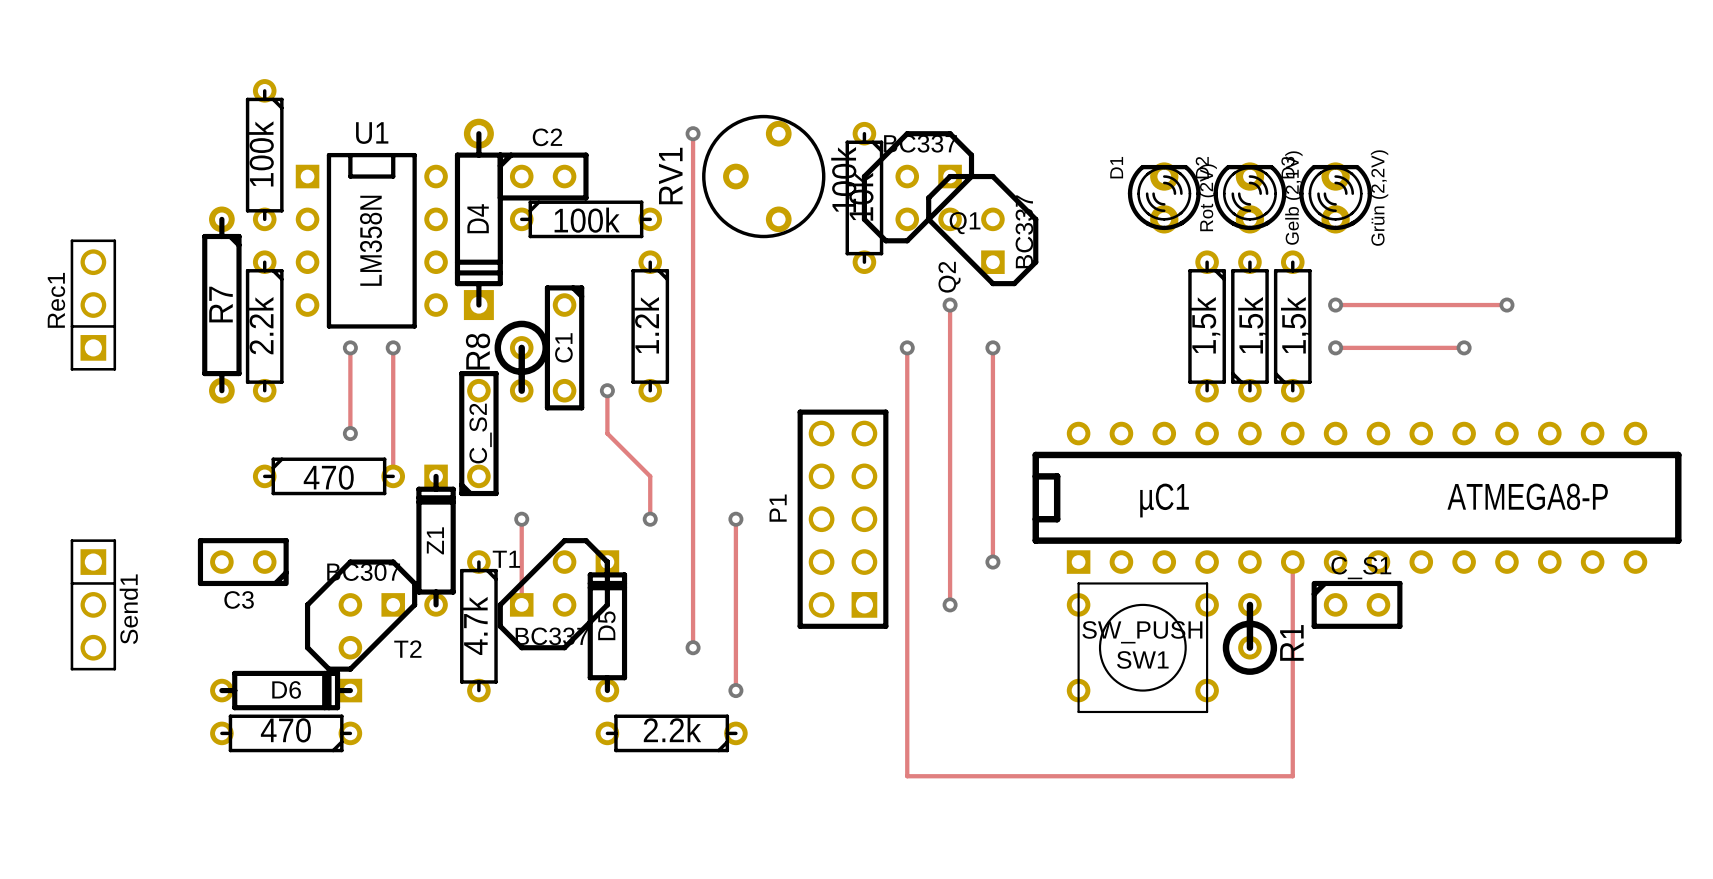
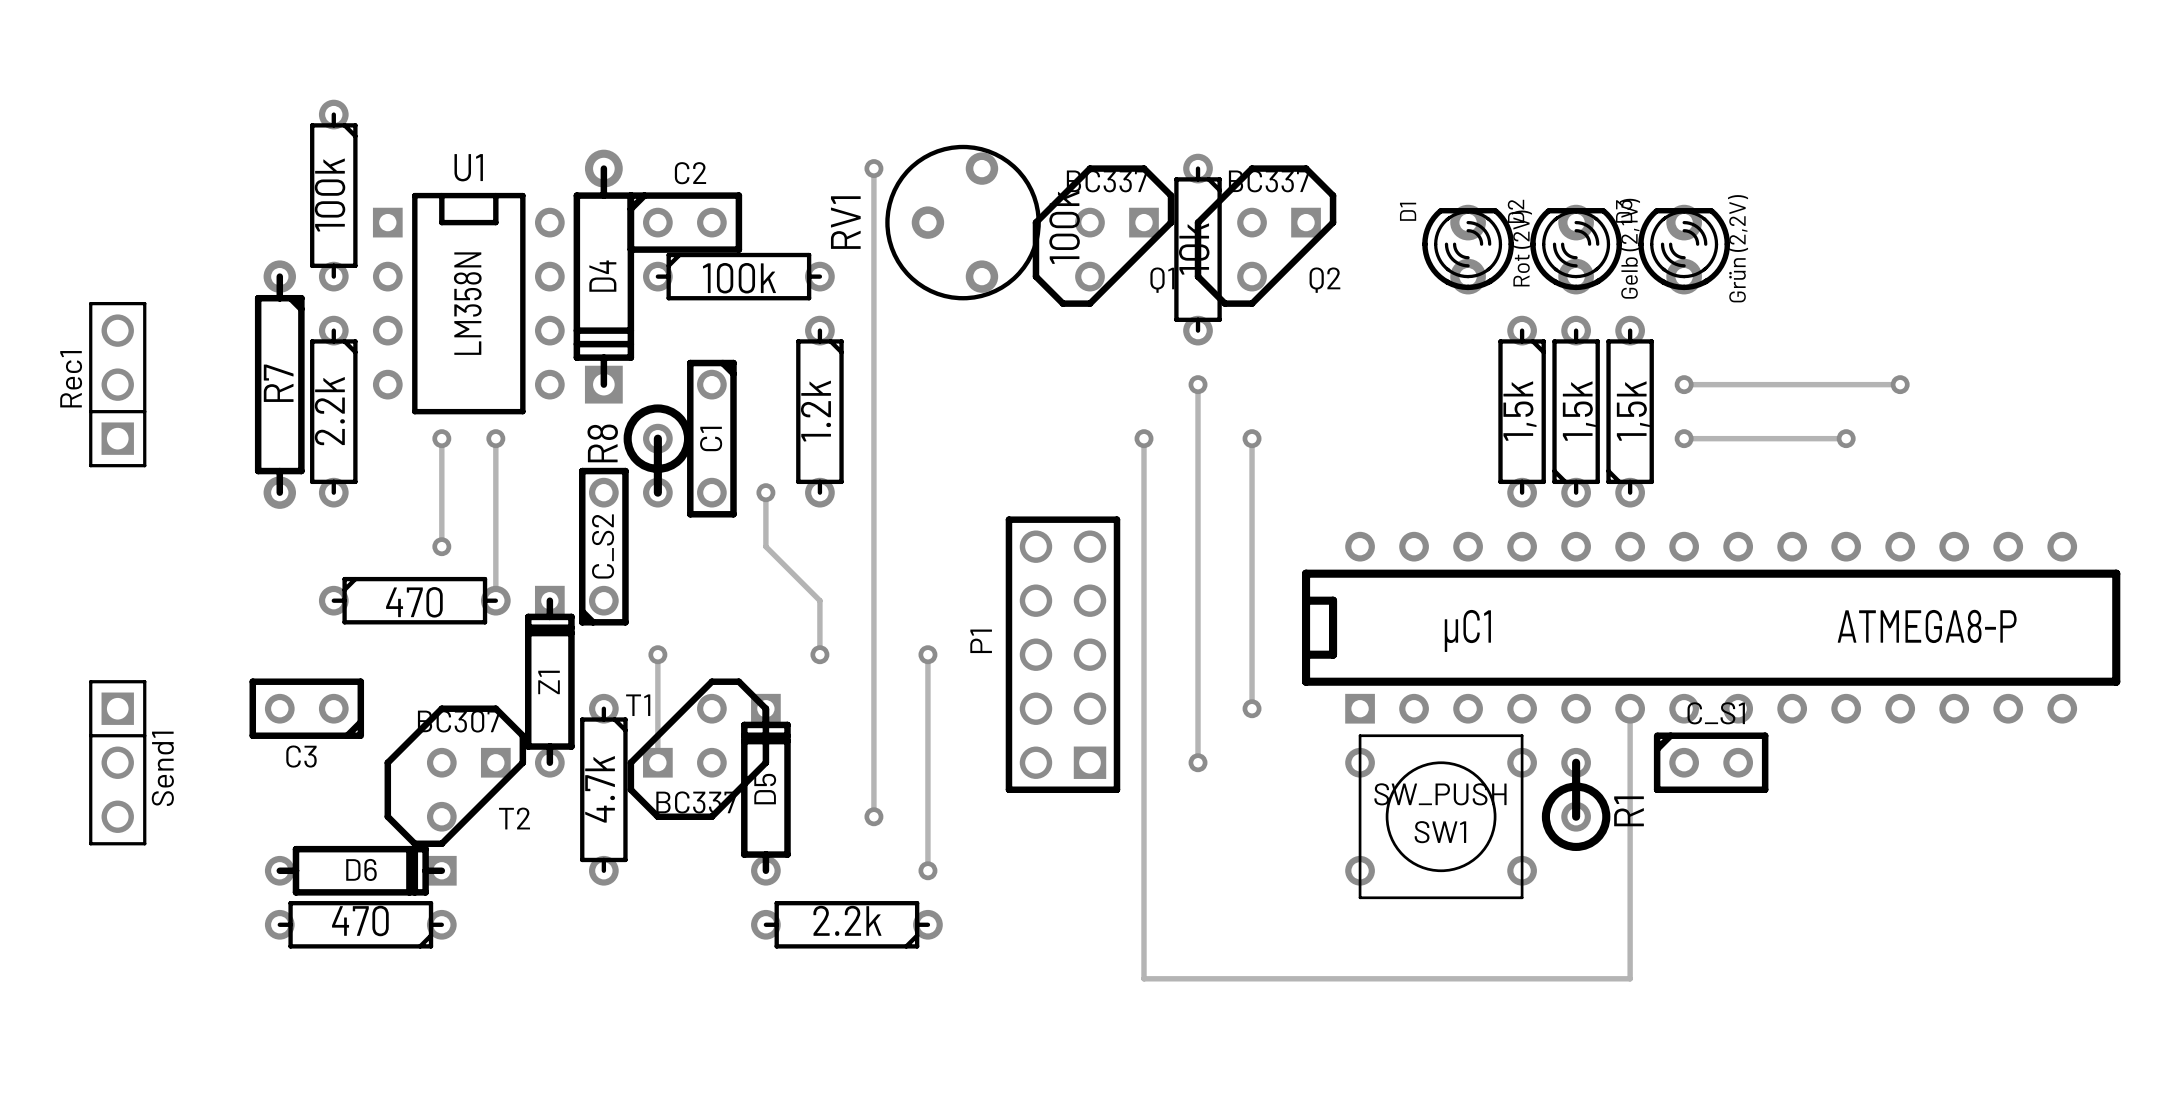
Q1 position: (917, 187) -> (1103, 236)
part position: (864, 197) -> (1198, 249)
Q2 rotation: 0° (982, 230) -> 90° counterclockwise (1265, 236)

